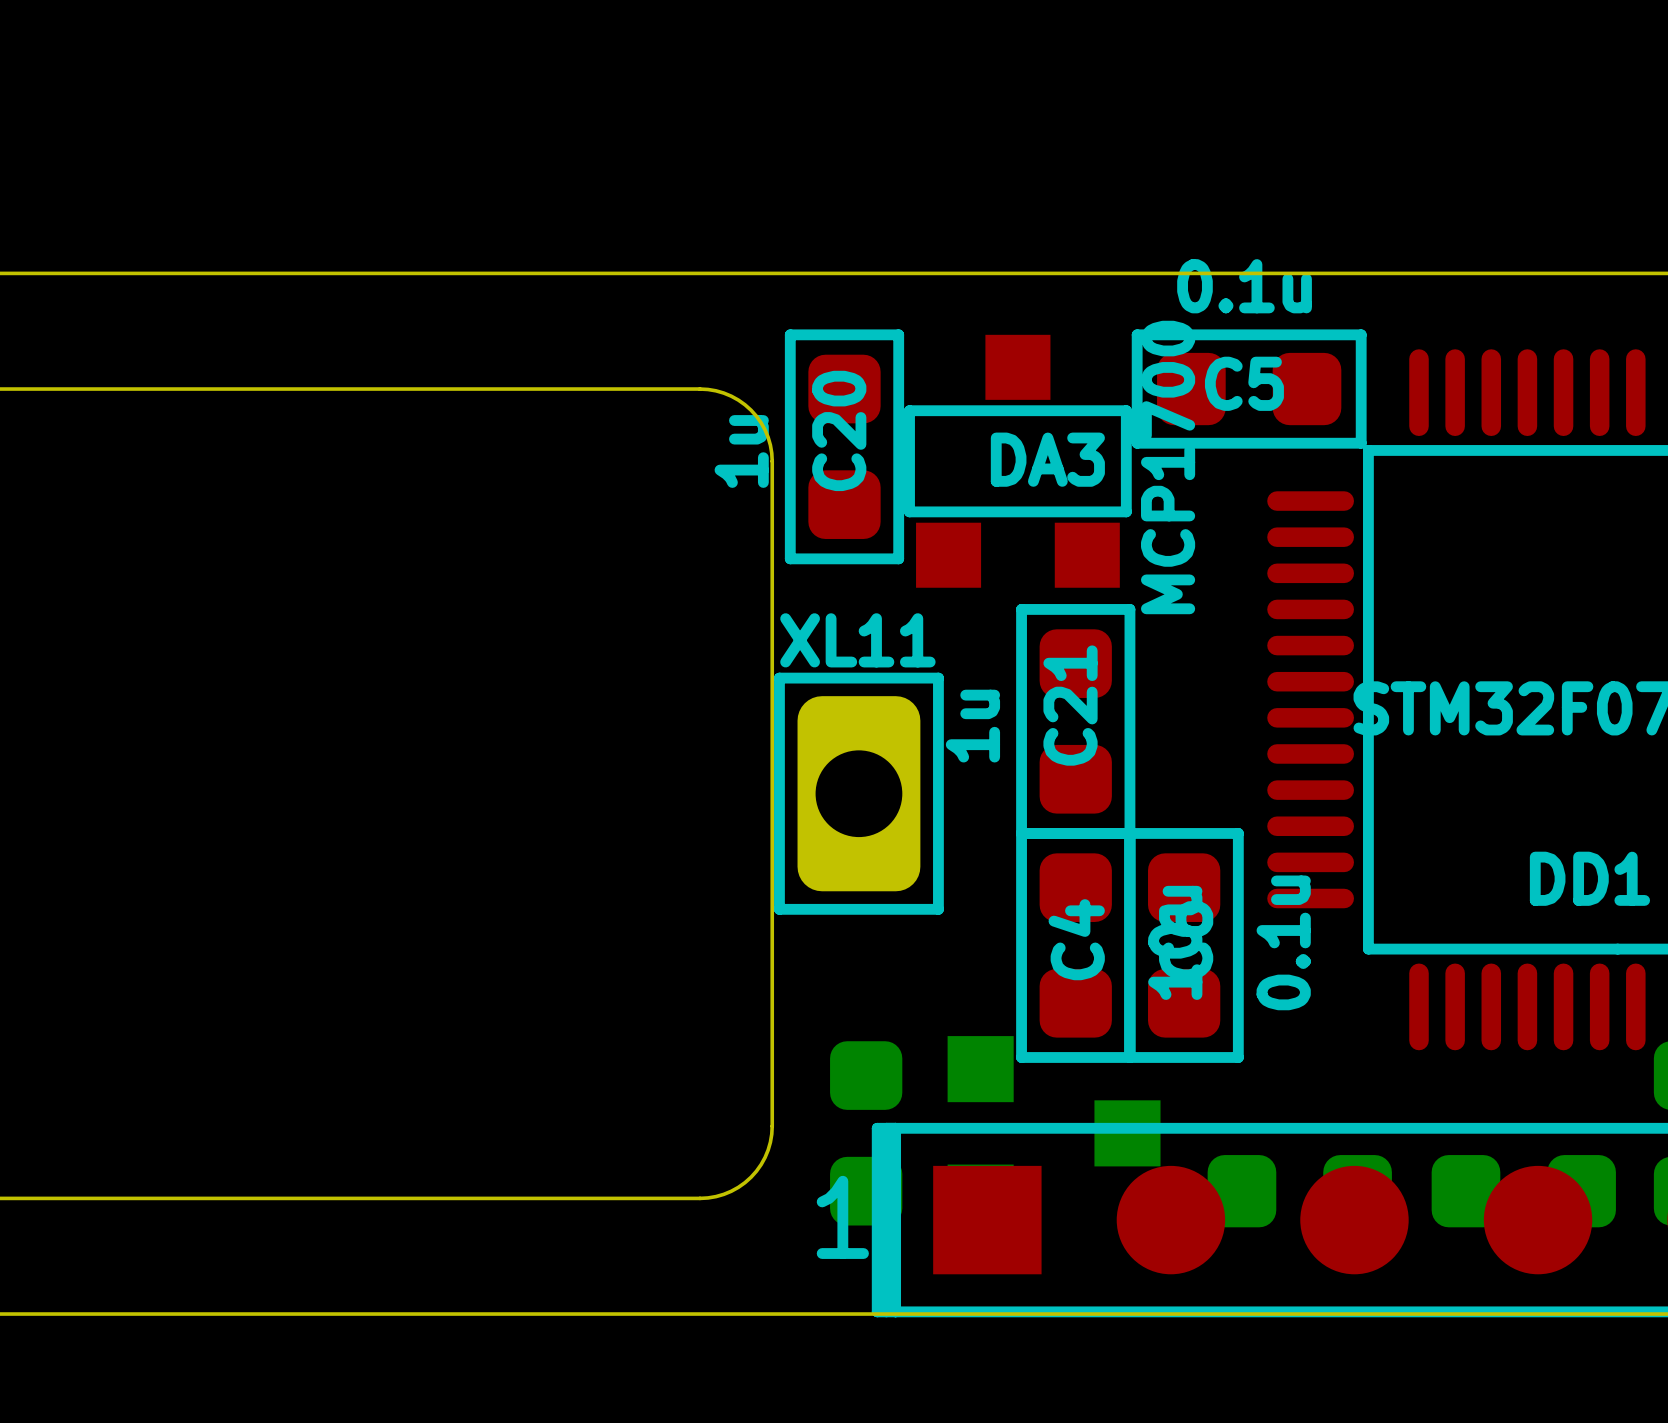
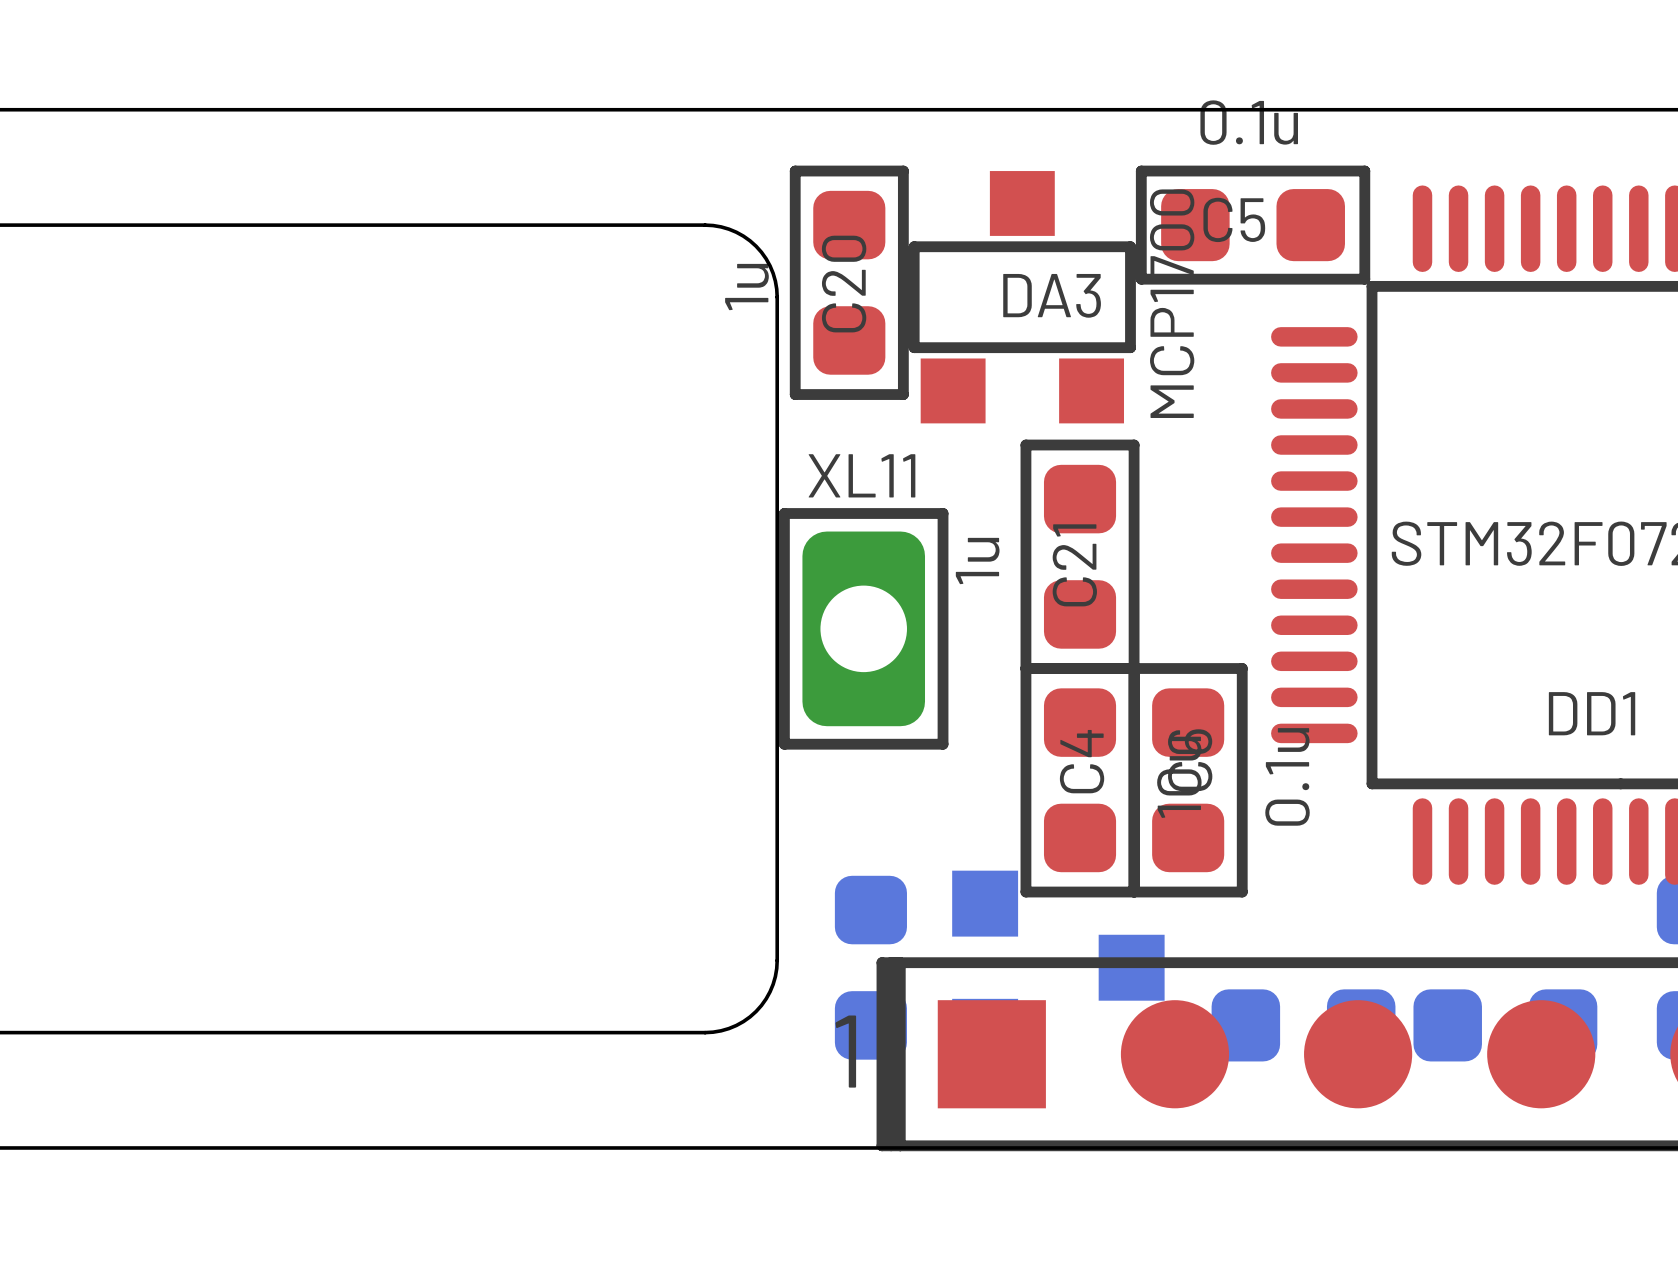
part position: (1523, 1191) -> (1505, 1025)

